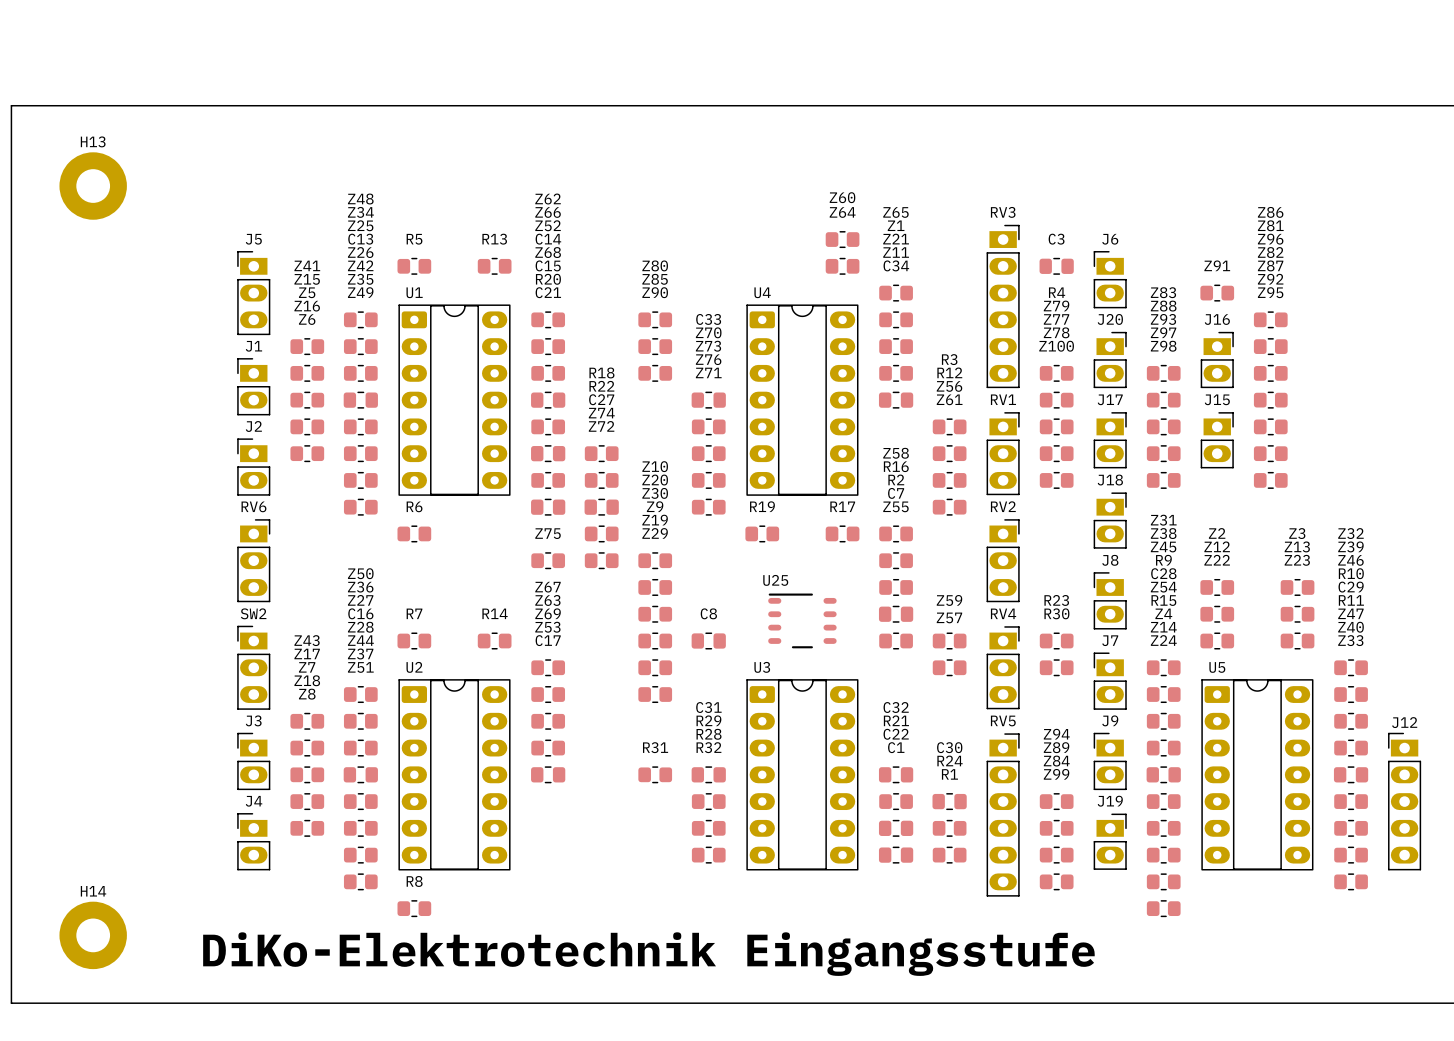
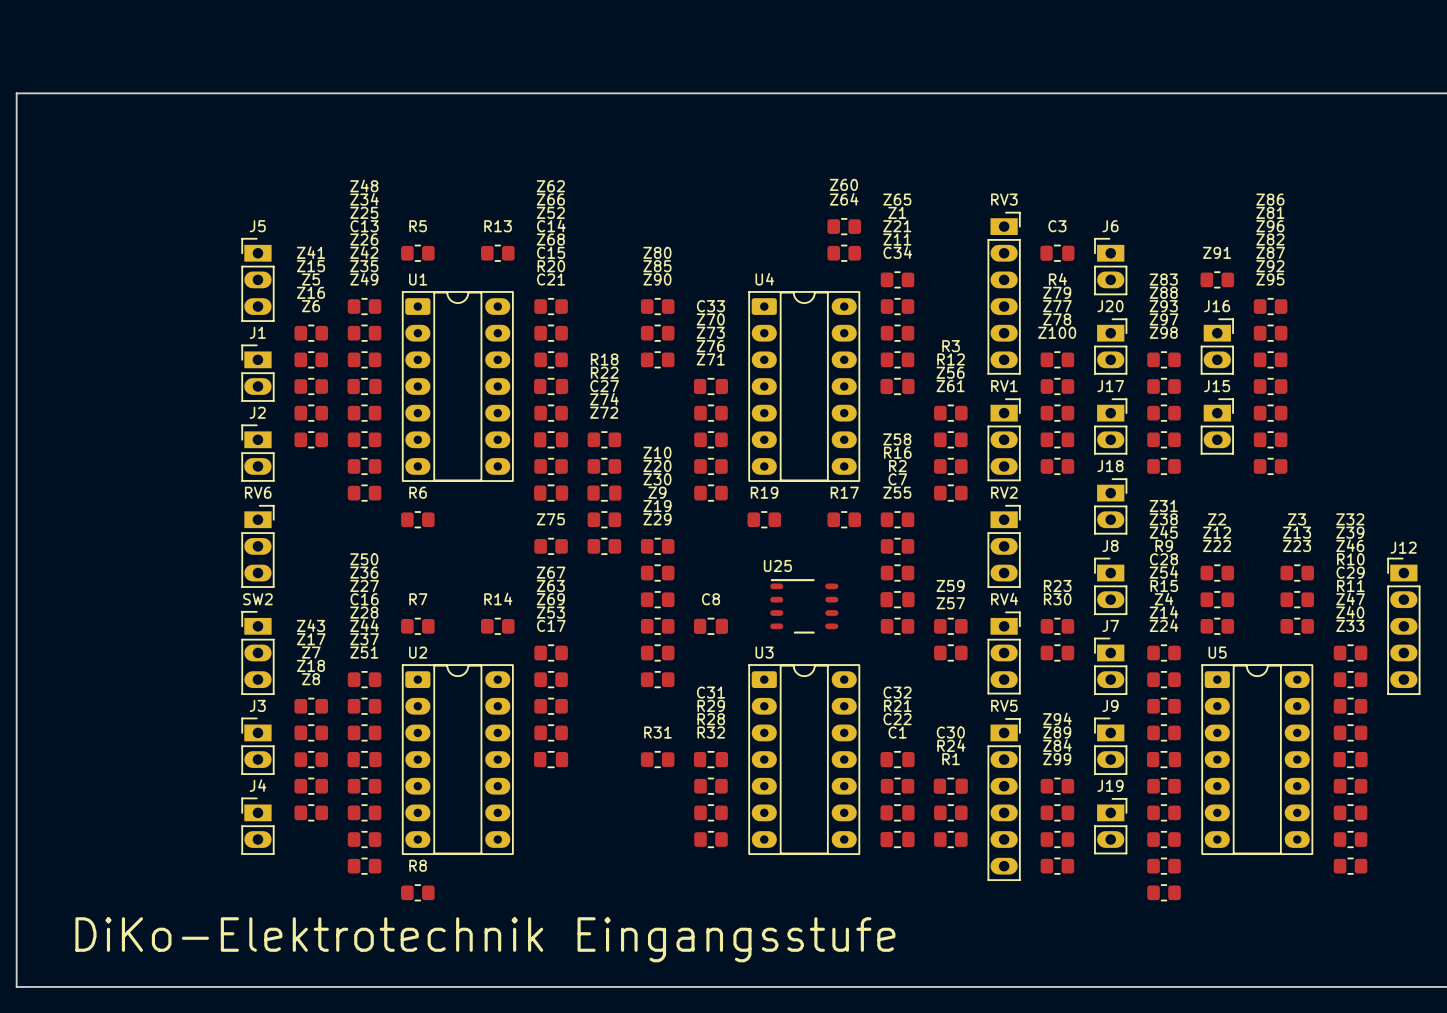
H13: (93, 186) -> none
J12 position: (1404, 801) -> (1403, 626)
H14: (93, 935) -> none
text position: DiKo-Elektrotechnik Eingangsstufe (648, 954) -> DiKo-Elektrotechnik Eingangsstufe (485, 939)

